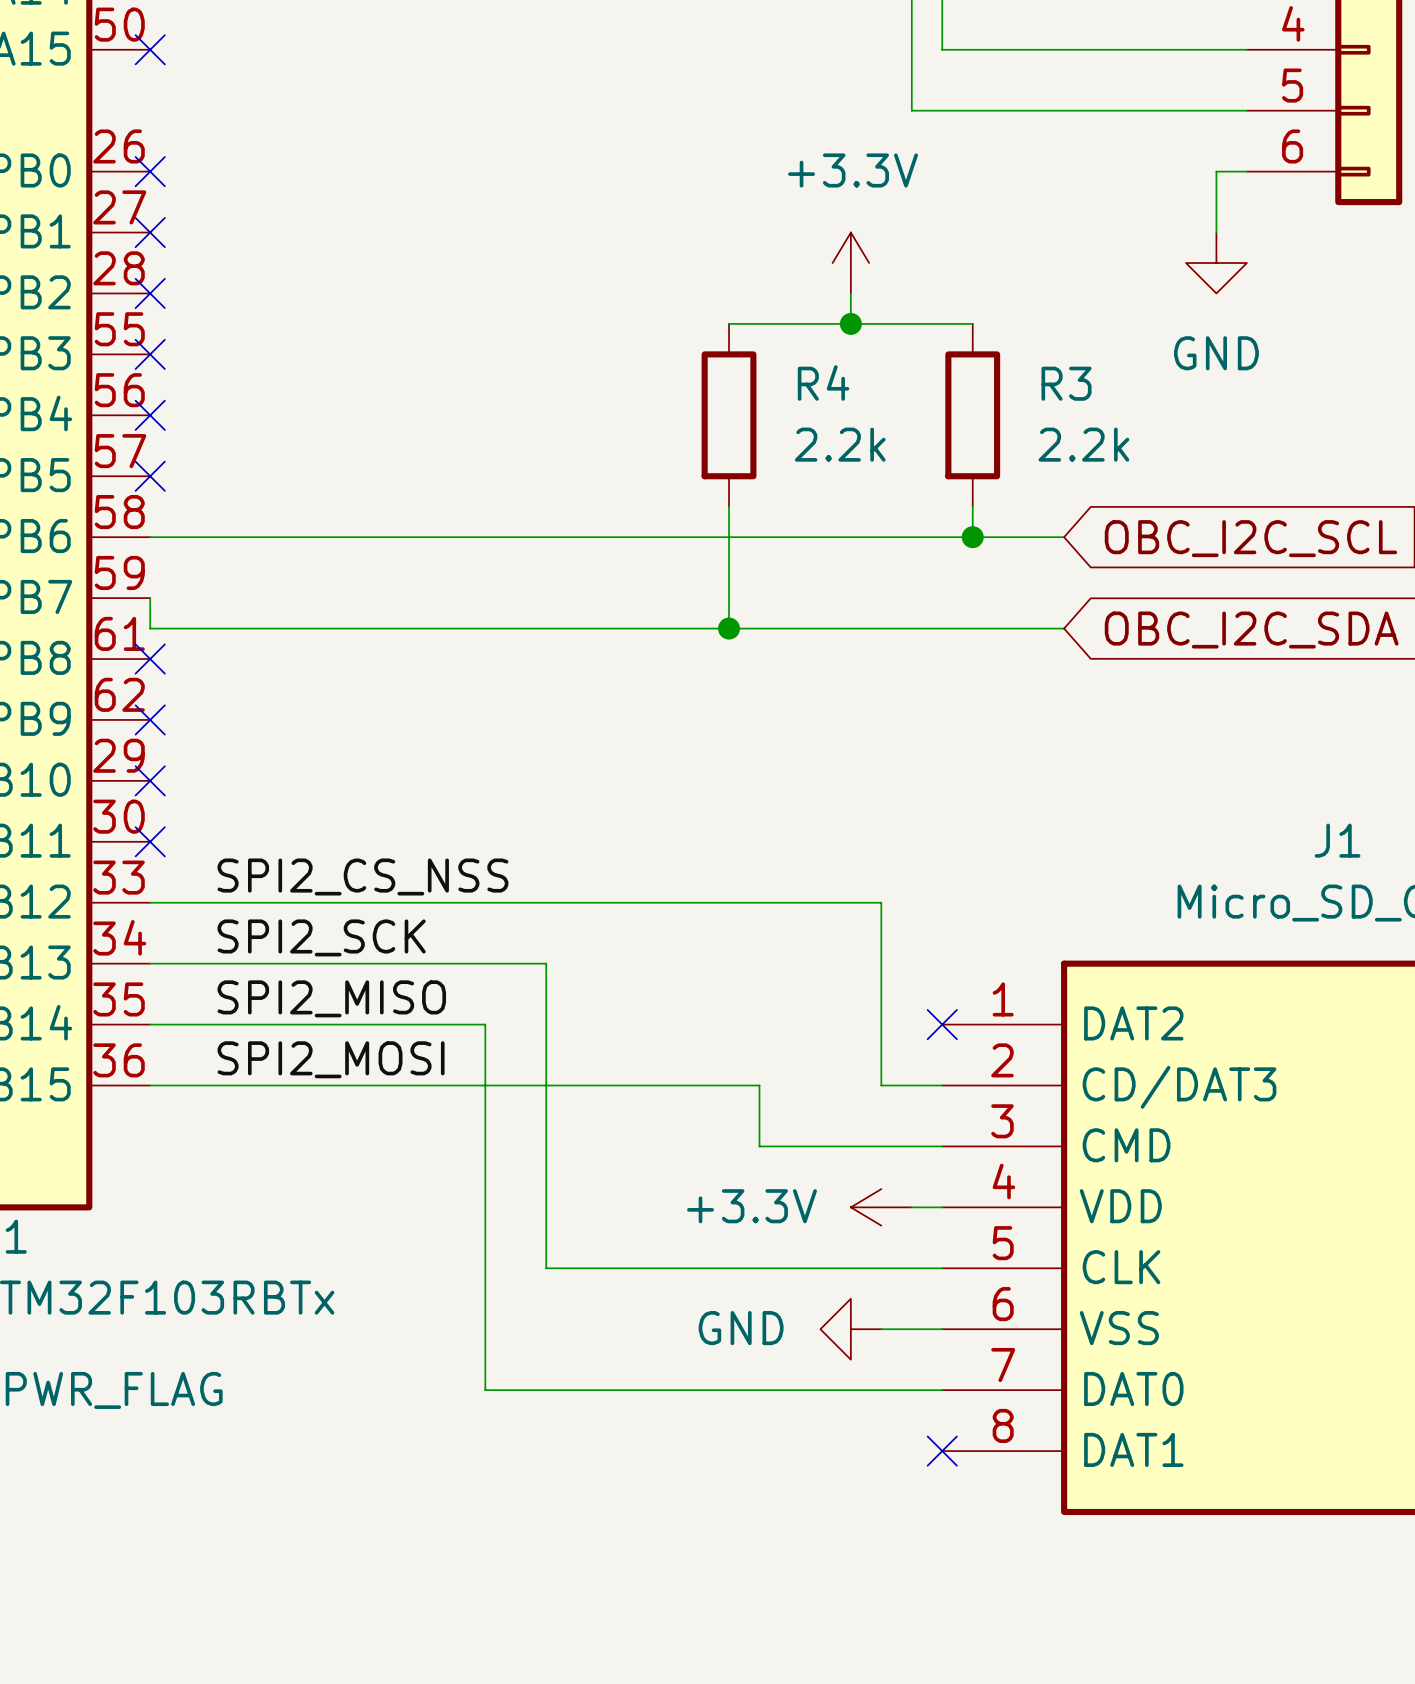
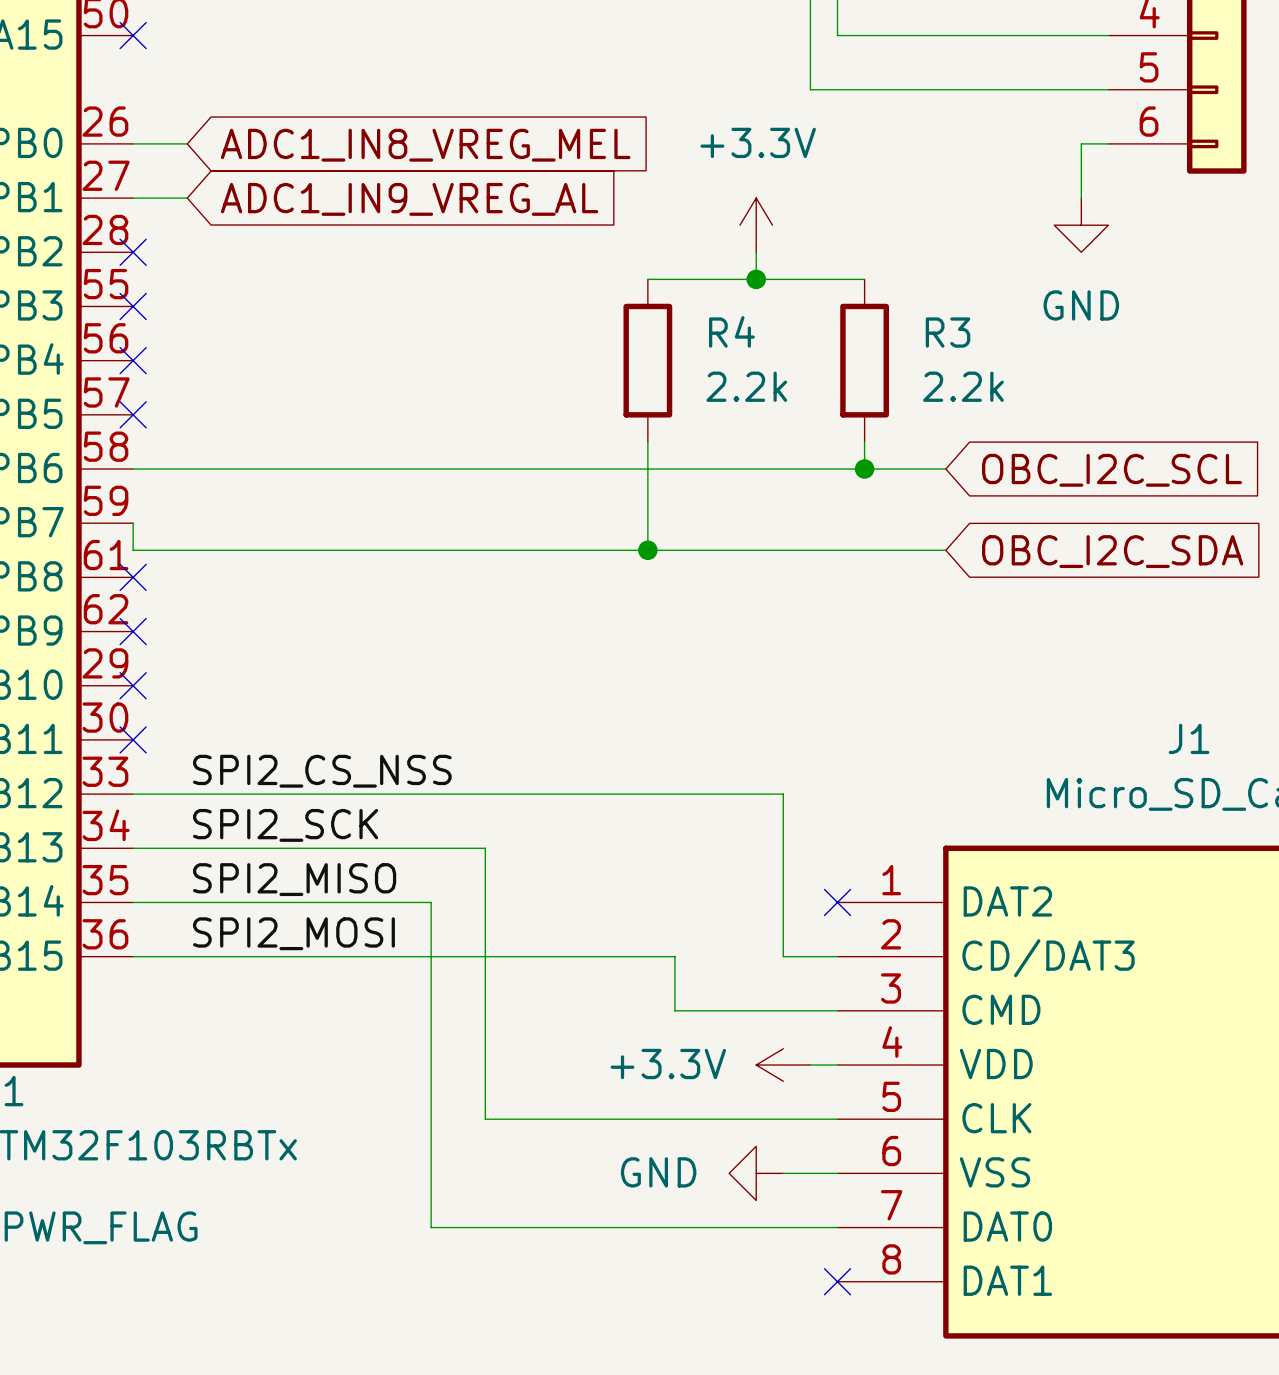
wire: none -> (133, 143) (187, 143)
no-connect mark: (150, 171) -> none
global label: none -> ADC1_IN8_VREG_MEL (425, 145)
wire: none -> (133, 198) (187, 198)
no-connect mark: (150, 232) -> none
global label: none -> ADC1_IN9_VREG_AL (409, 199)

